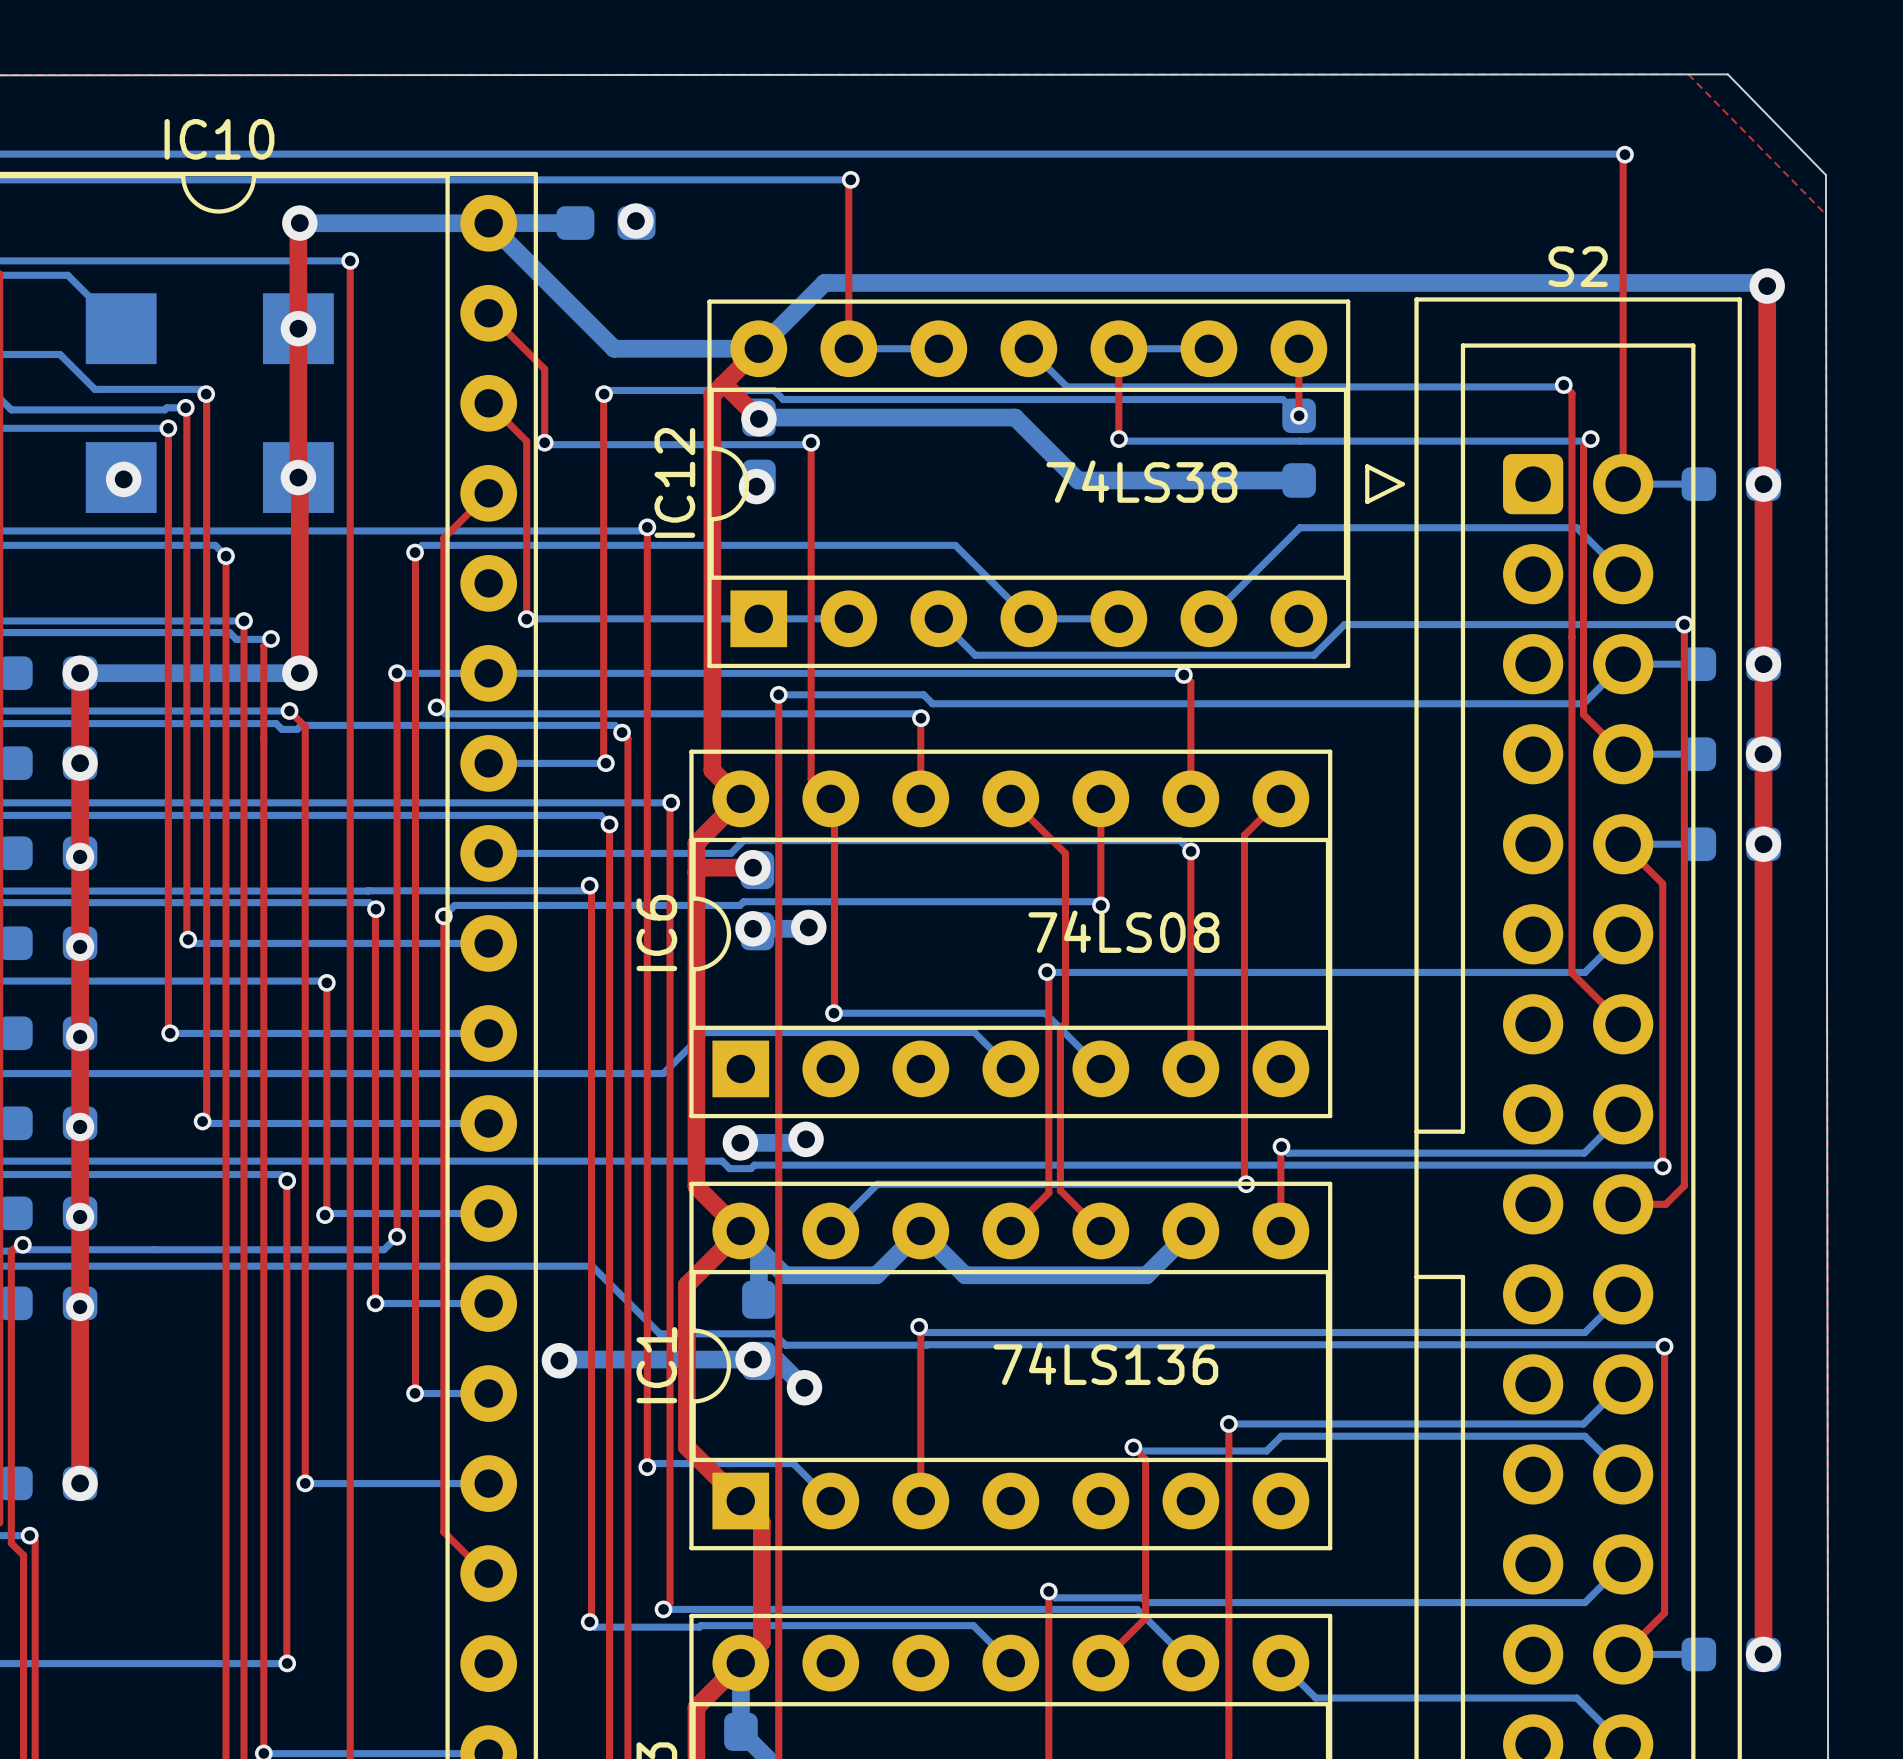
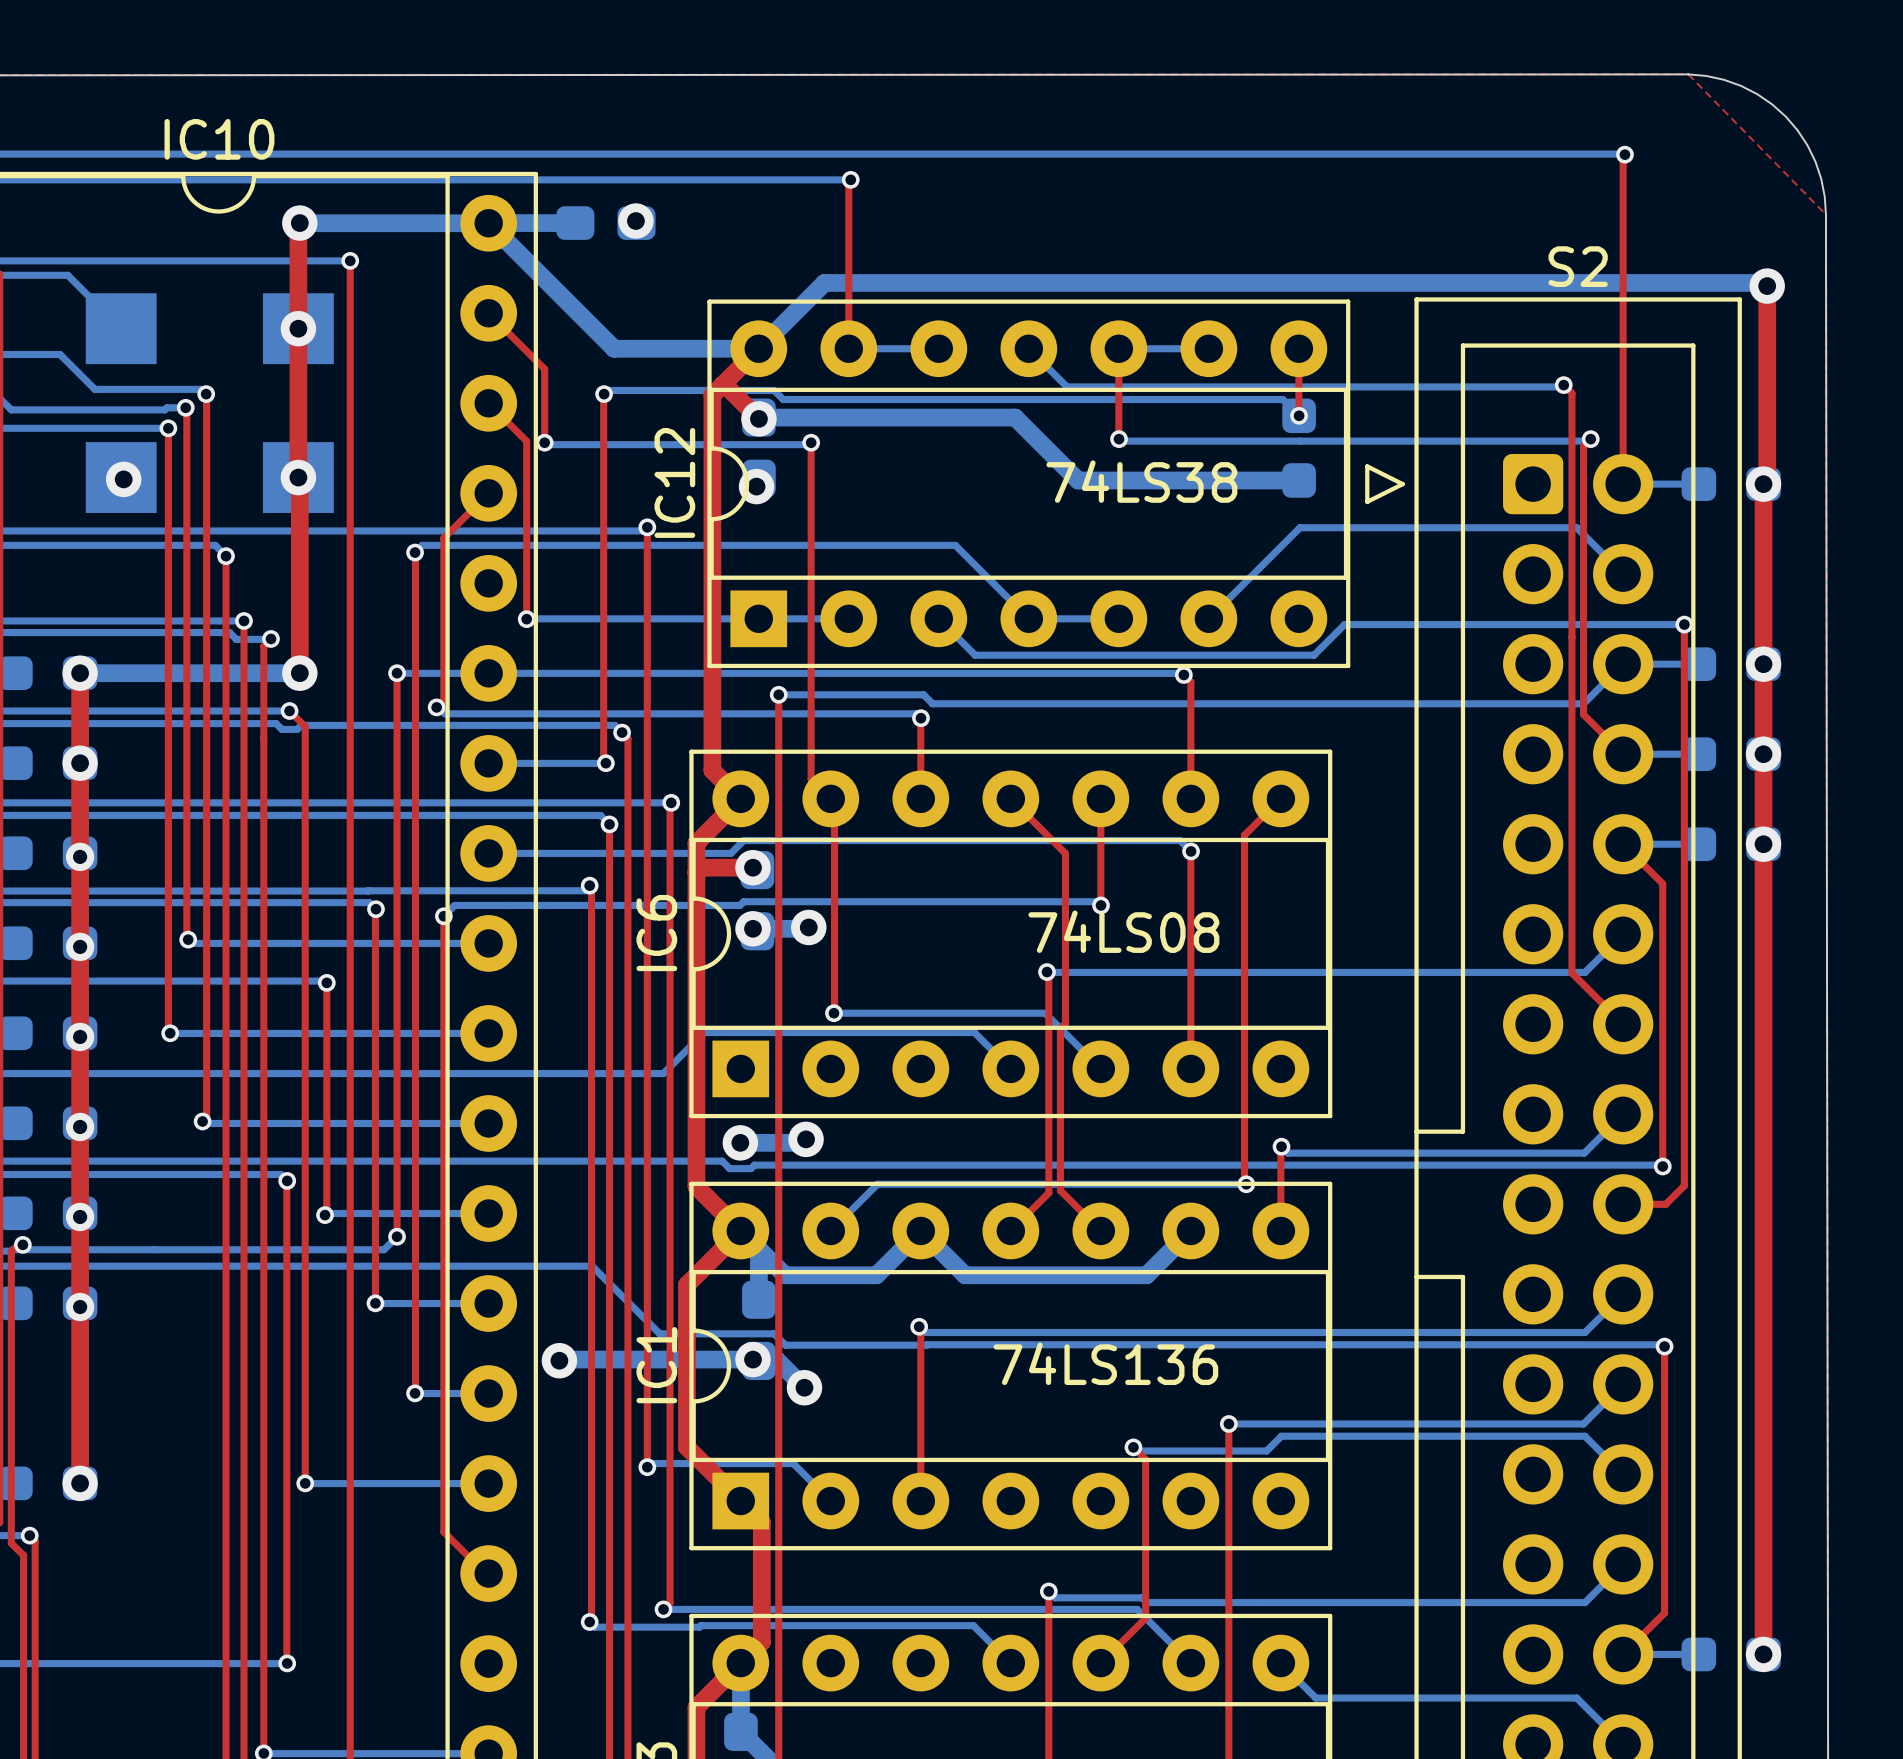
board edge: (1688, 74) (1727, 74) (1825, 175) (1825, 215) -> (1688, 74) (1724, 79) (1741, 85) (1772, 104) (1785, 116) (1807, 145) (1815, 161) (1821, 179) (1825, 215)

